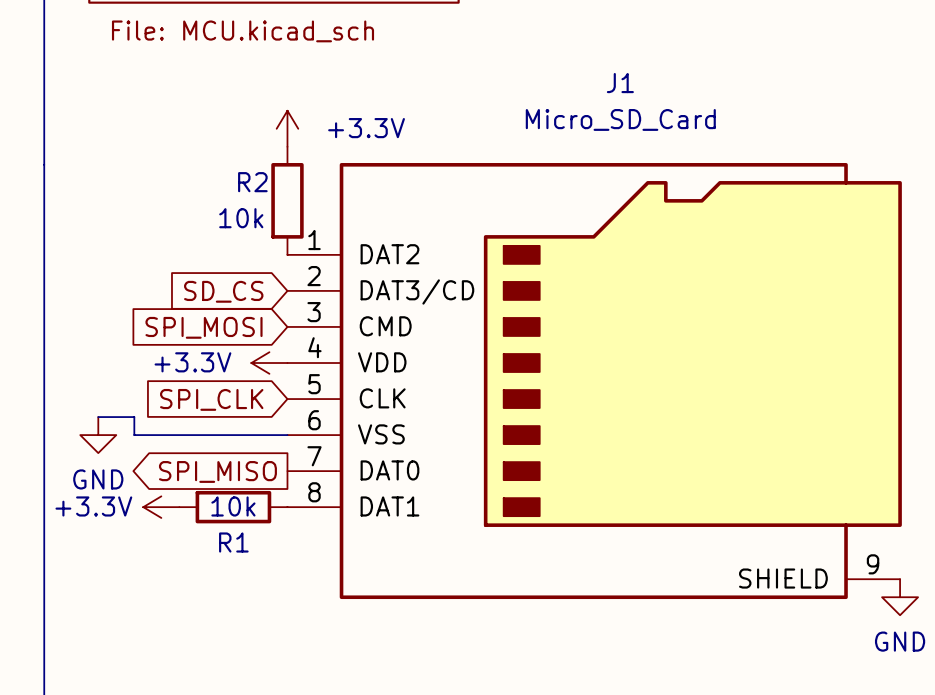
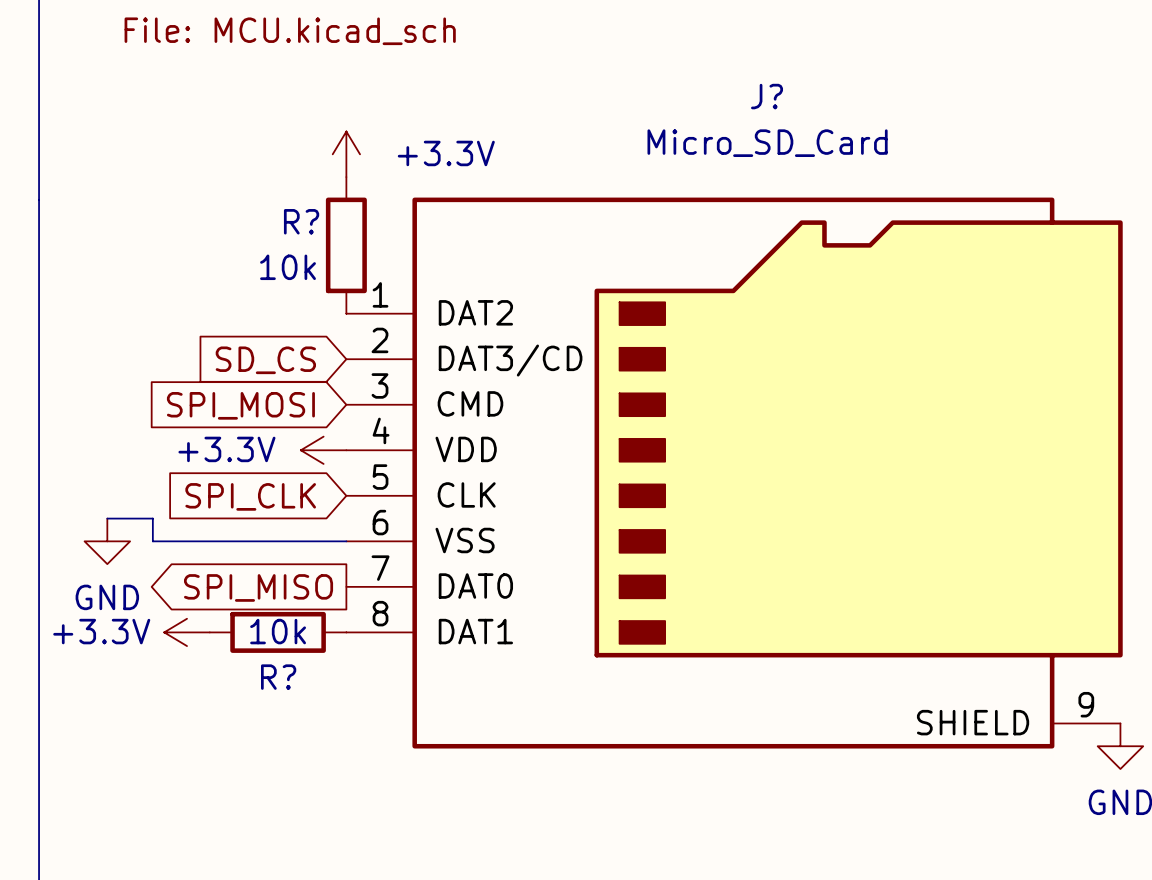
J1 name: J1 (620, 83) -> J? (767, 96)
R2 name: R2 (252, 182) -> R? (301, 221)
R1 name: R1 (233, 542) -> R? (278, 677)

